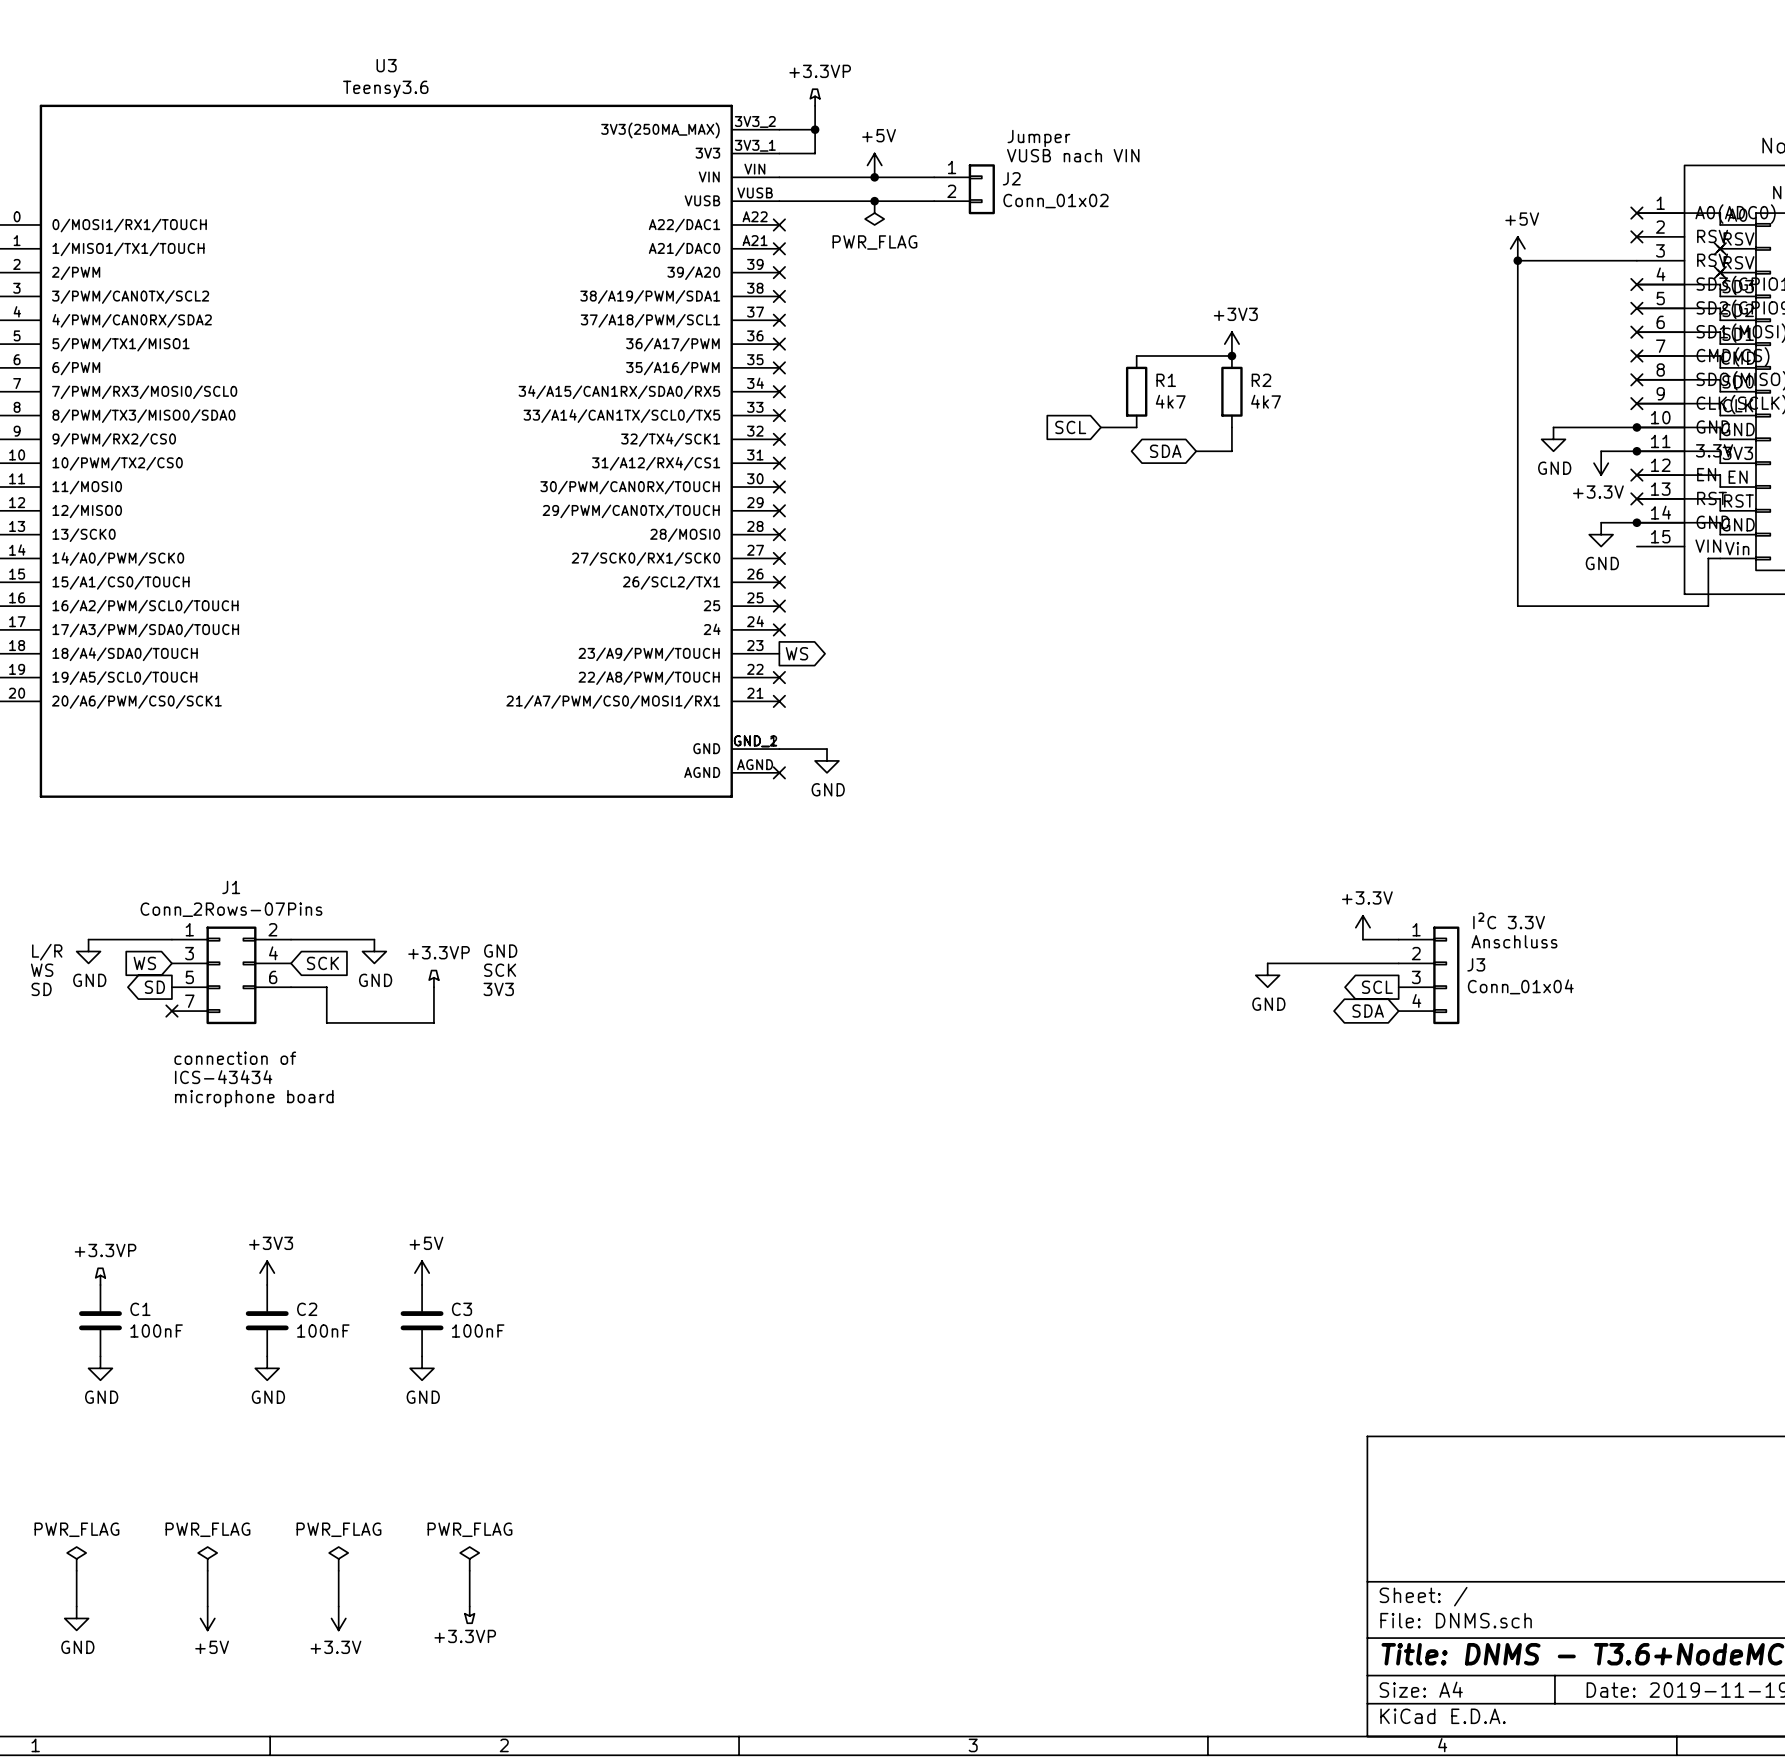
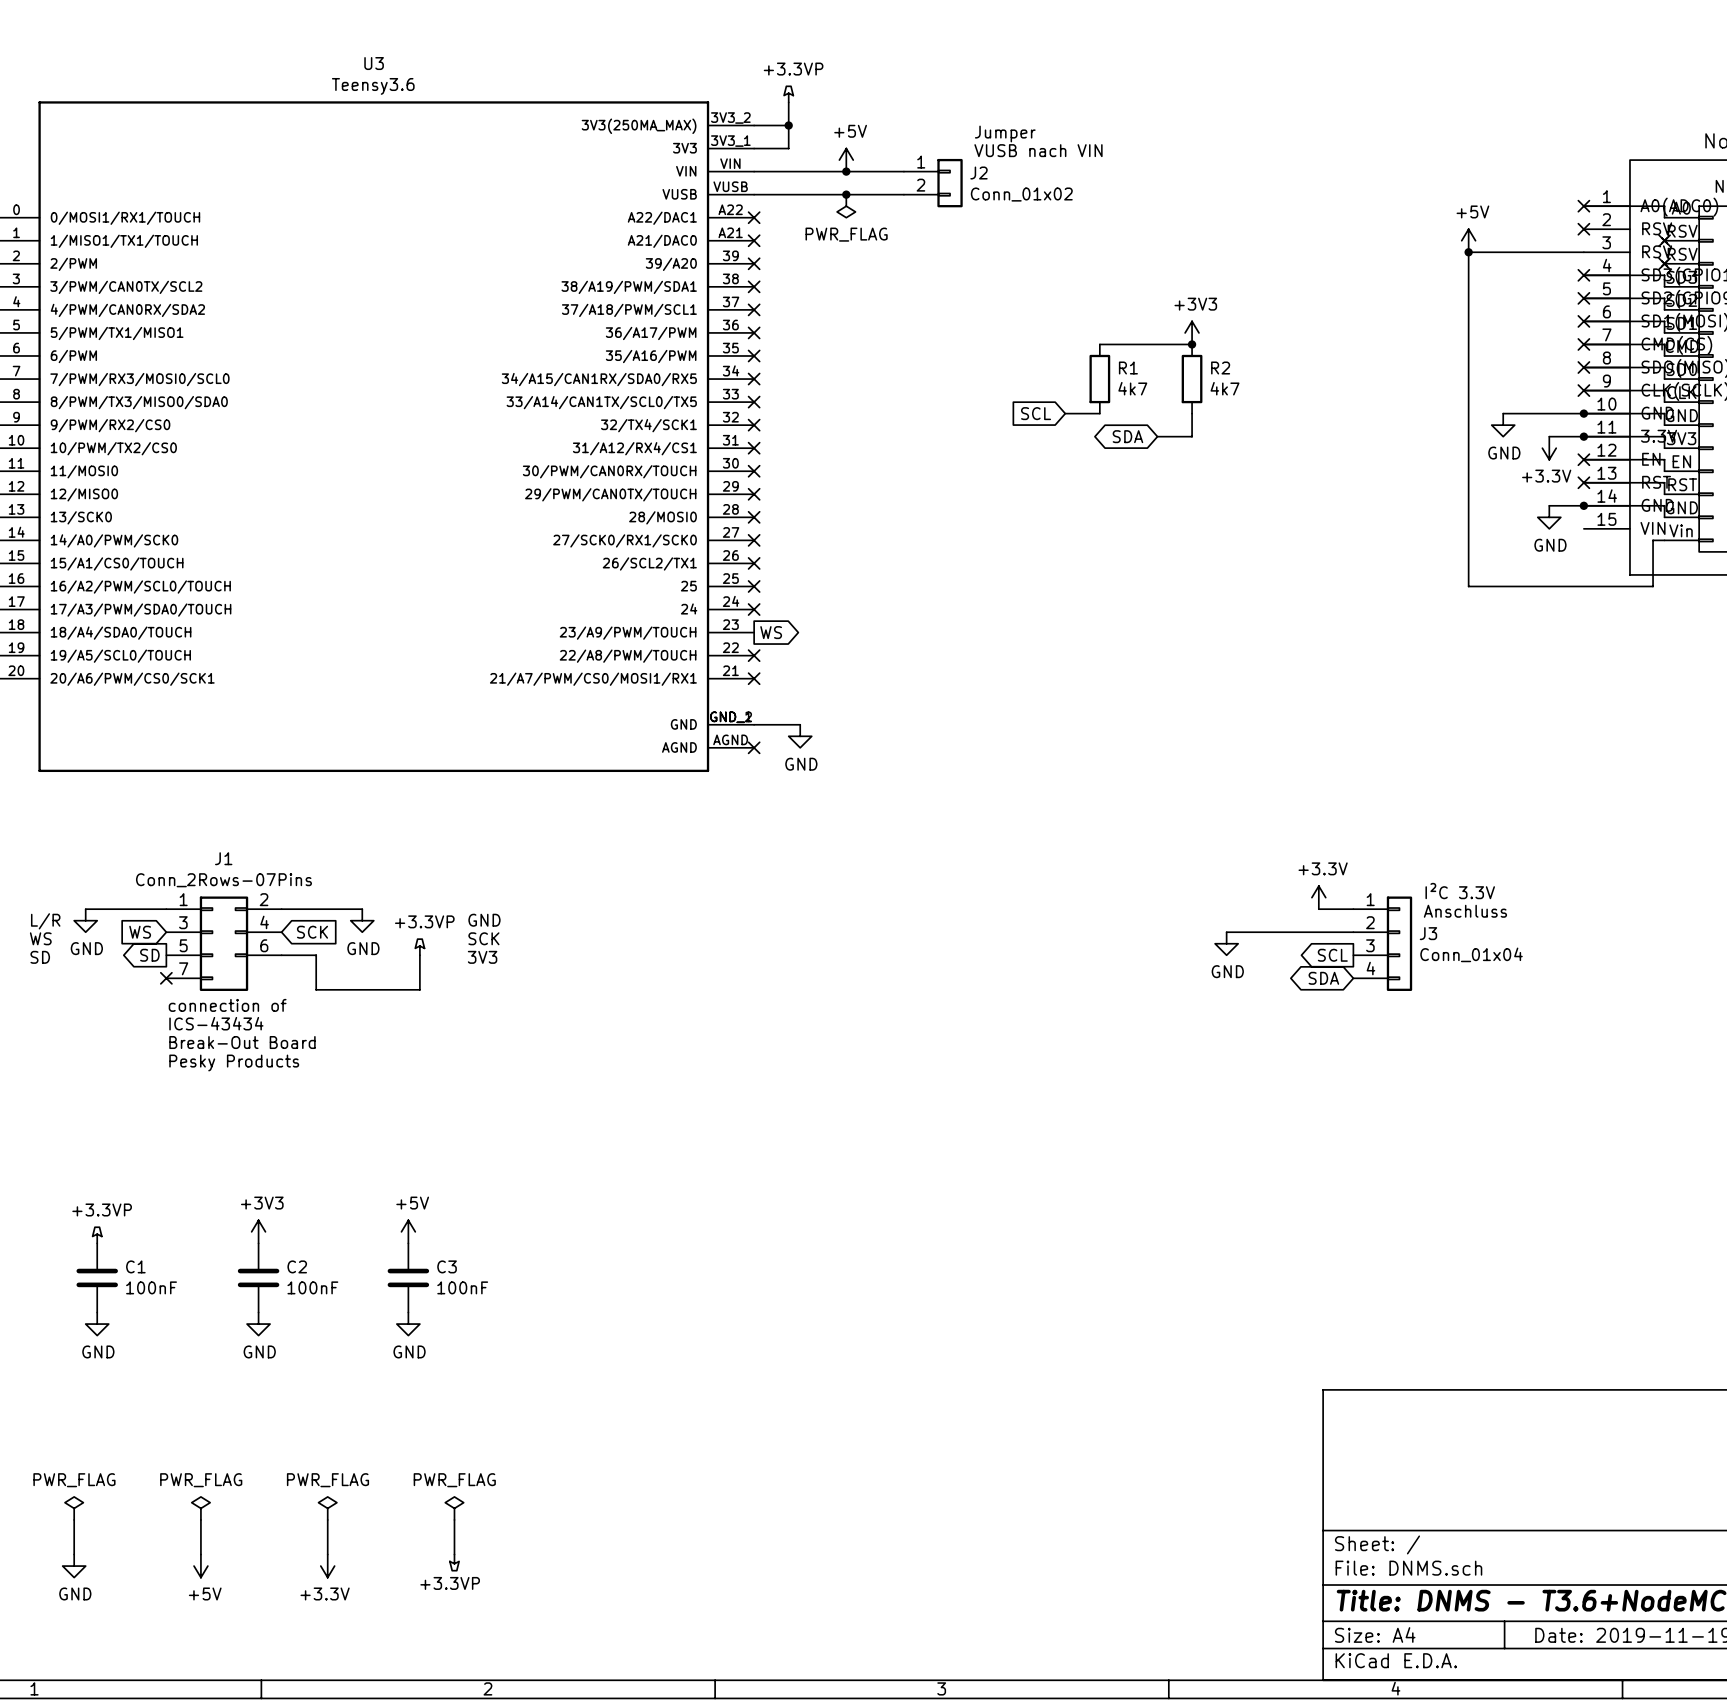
text: none -> connection of (227, 1005)
text: connection of (235, 1058) -> ICS-43434 (216, 1023)
text: ICS-43434 (223, 1077) -> Break-Out Board (242, 1042)
text: microphone board (254, 1098) -> Pesky Products (234, 1062)

